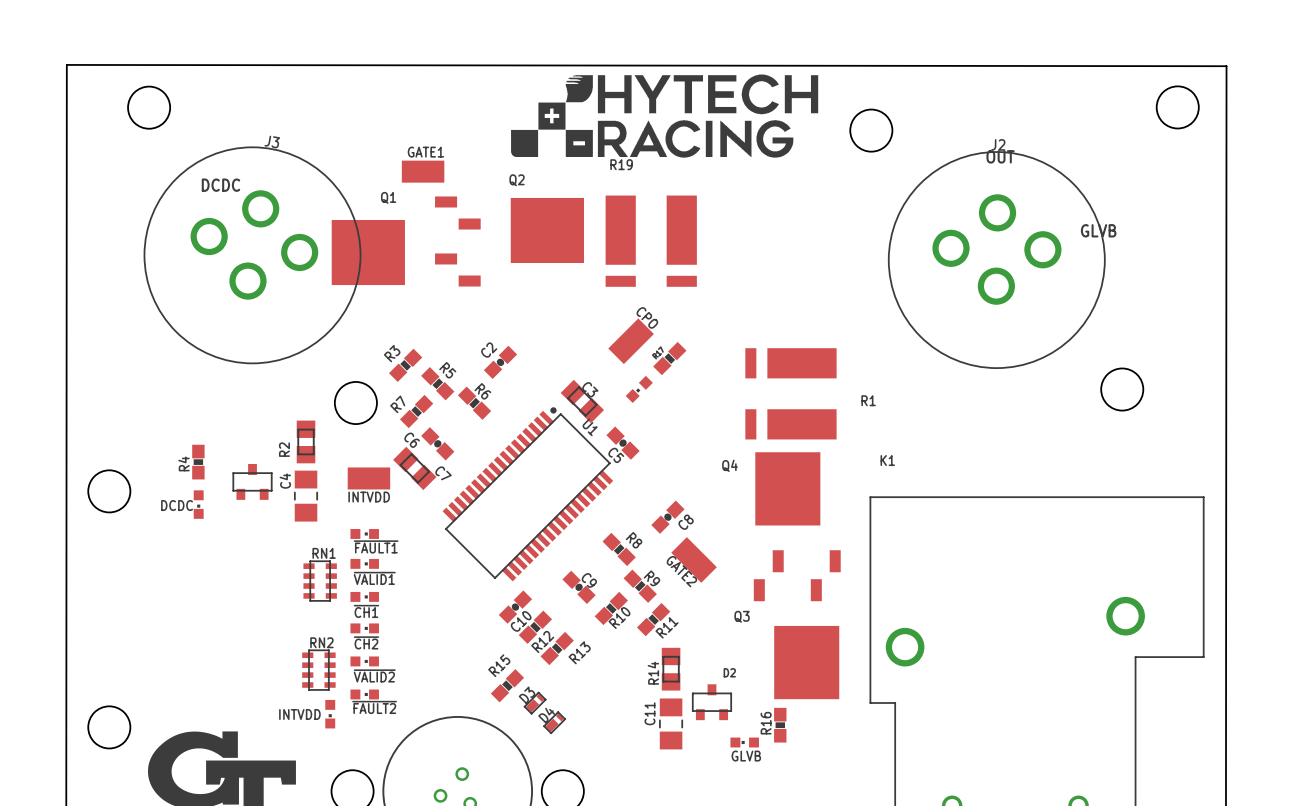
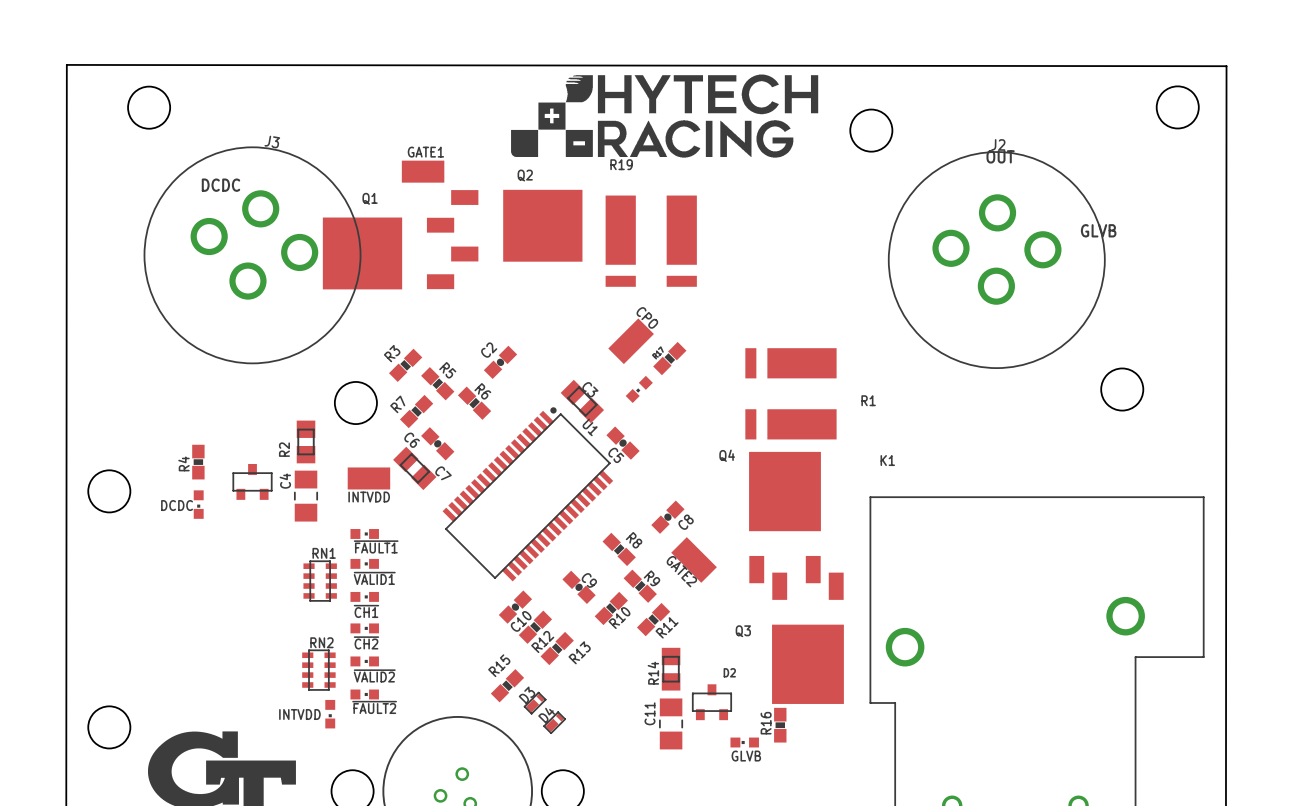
Q2 footprint: [435, 196, 585, 265] -> [451, 189, 583, 262]
Q1 footprint: [331, 218, 481, 287] -> [322, 217, 455, 290]
Q4 footprint: [753, 452, 822, 602] -> [749, 451, 821, 584]
Q3 footprint: [772, 550, 841, 700] -> [772, 572, 844, 704]

